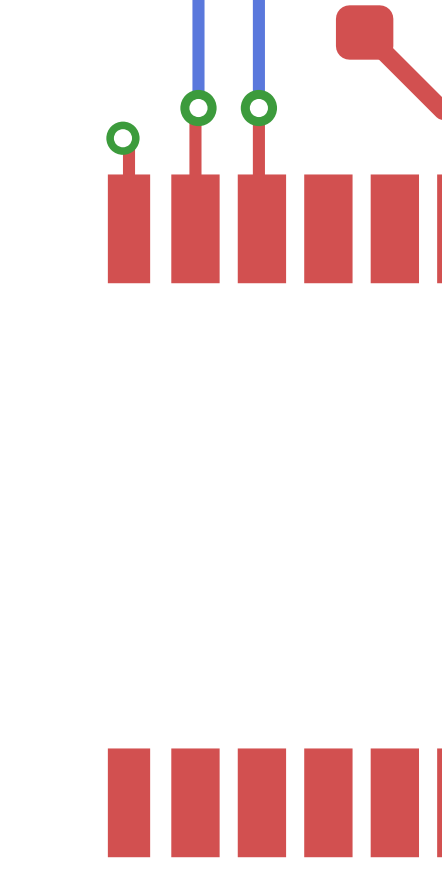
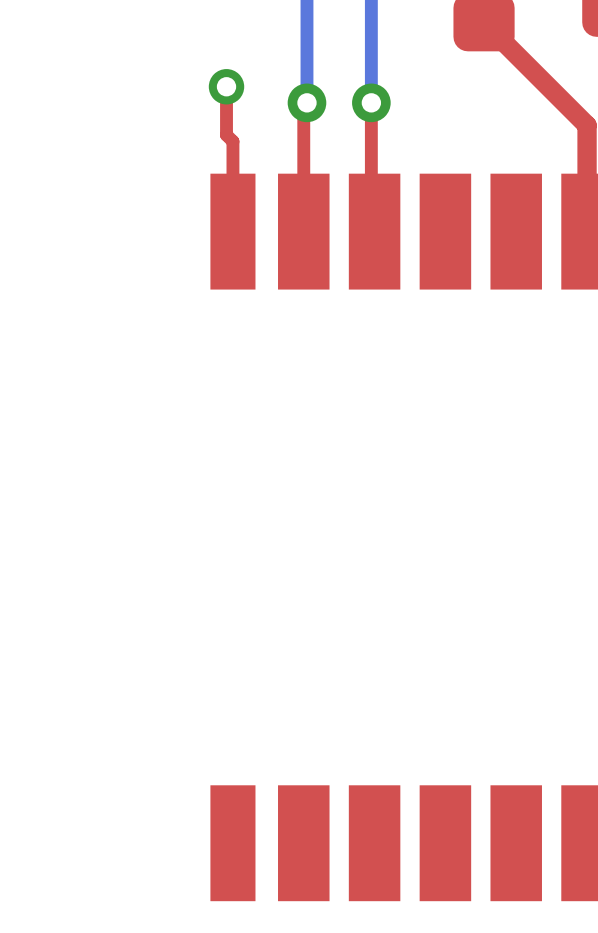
top track: none -> (226, 86) (226, 135)
via position: (122, 138) -> (226, 86)

